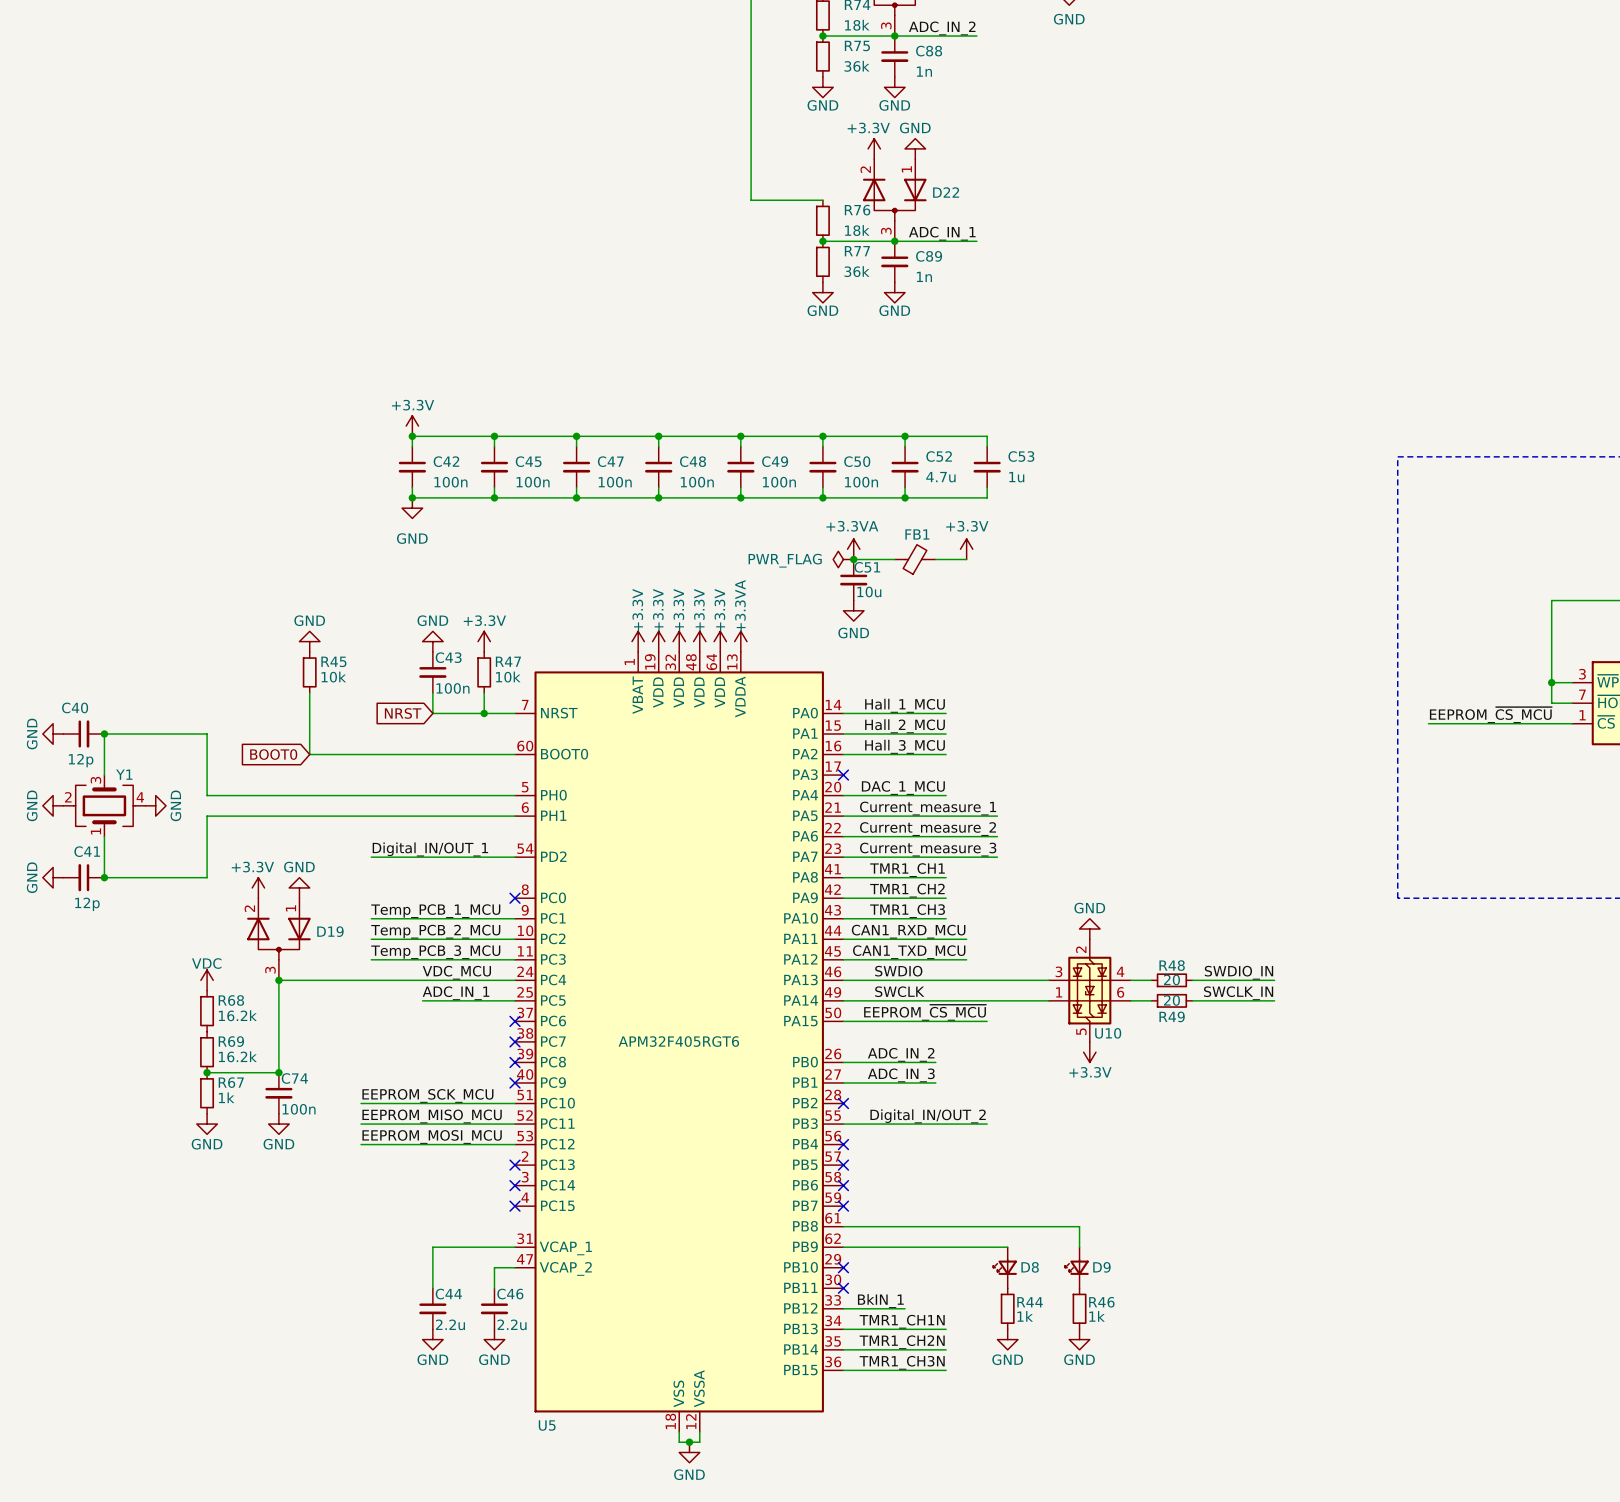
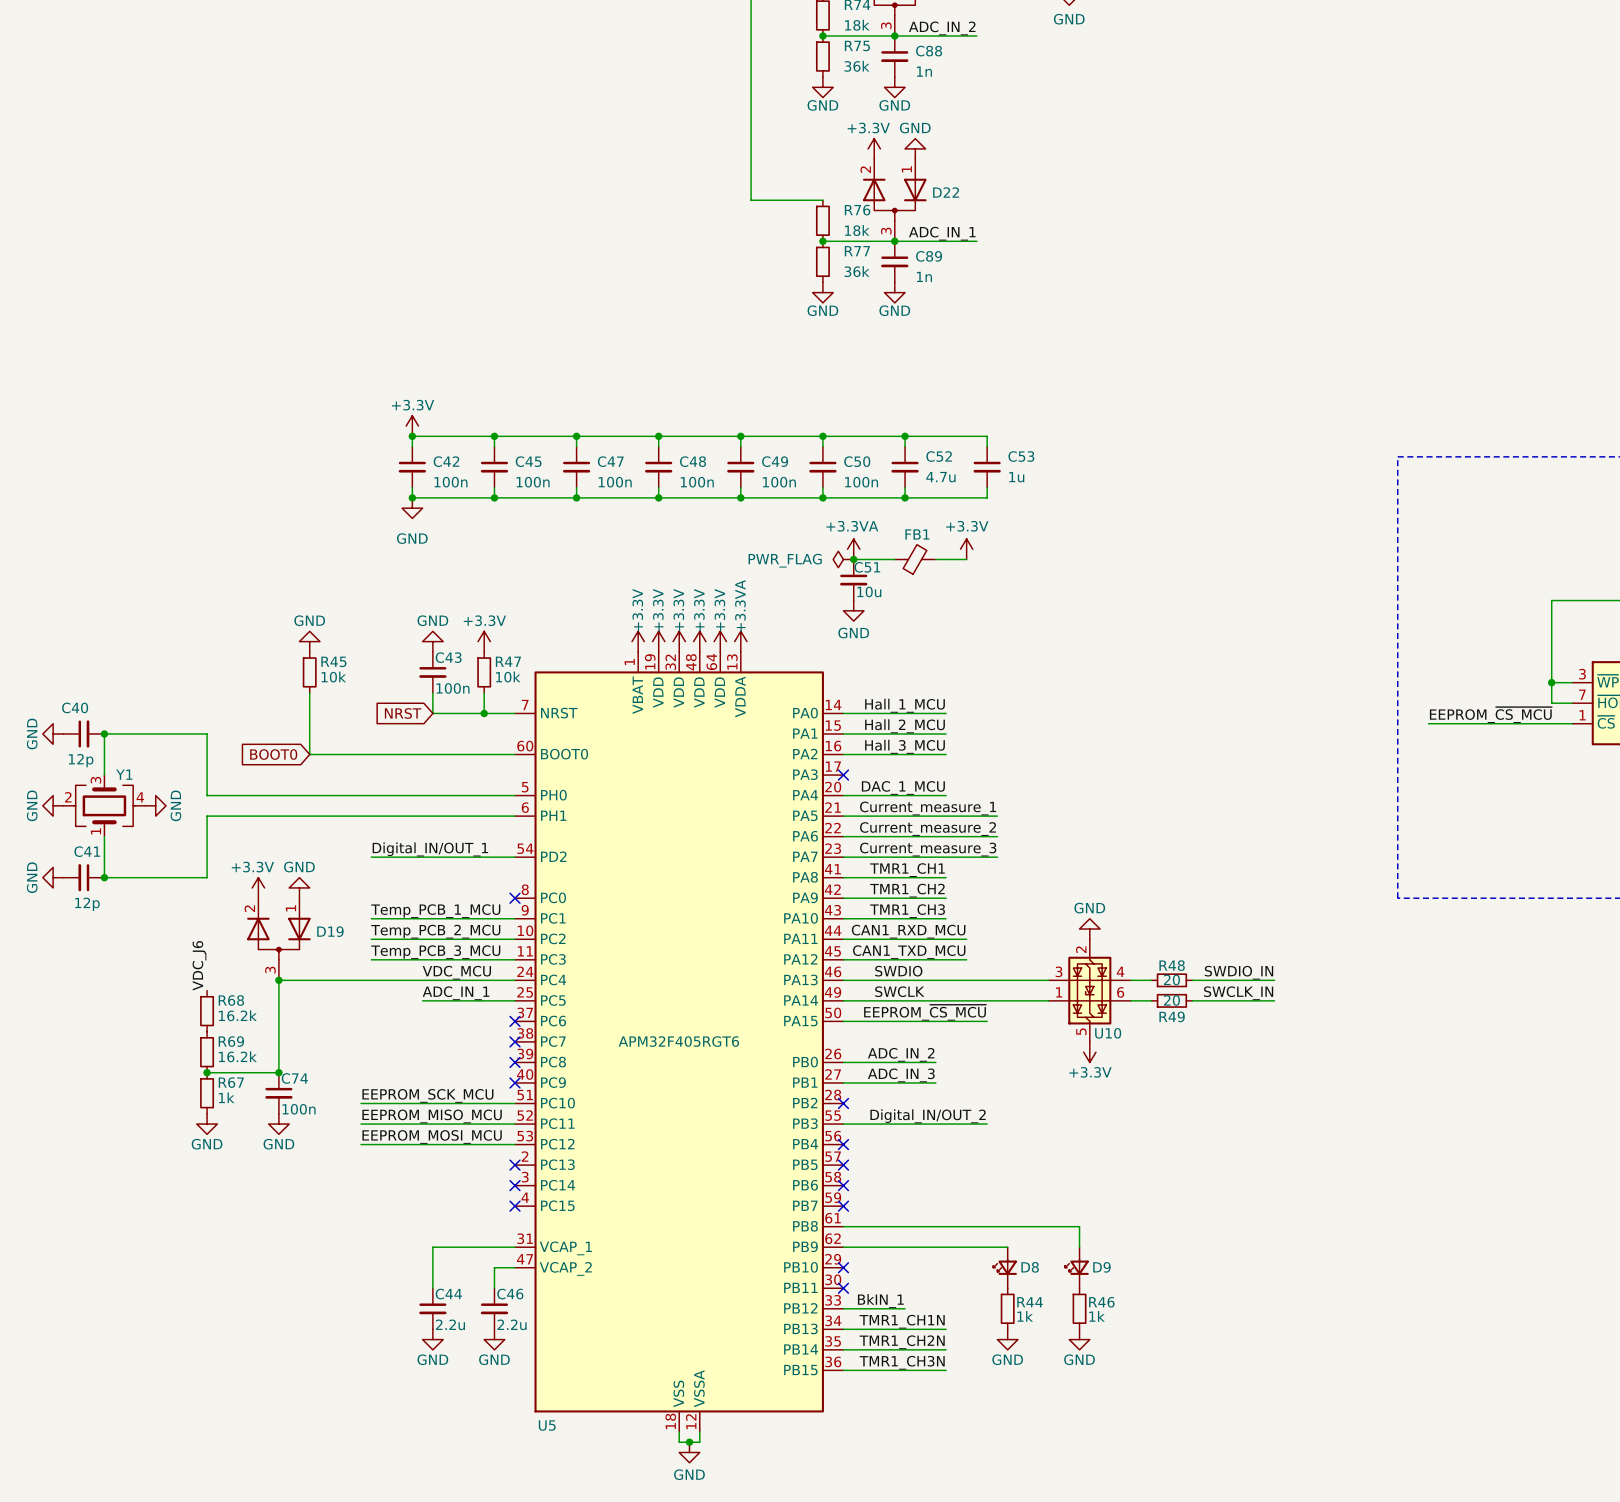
label: none -> VDC_J6 (199, 965)
power symbol: VDC (207, 980) -> none

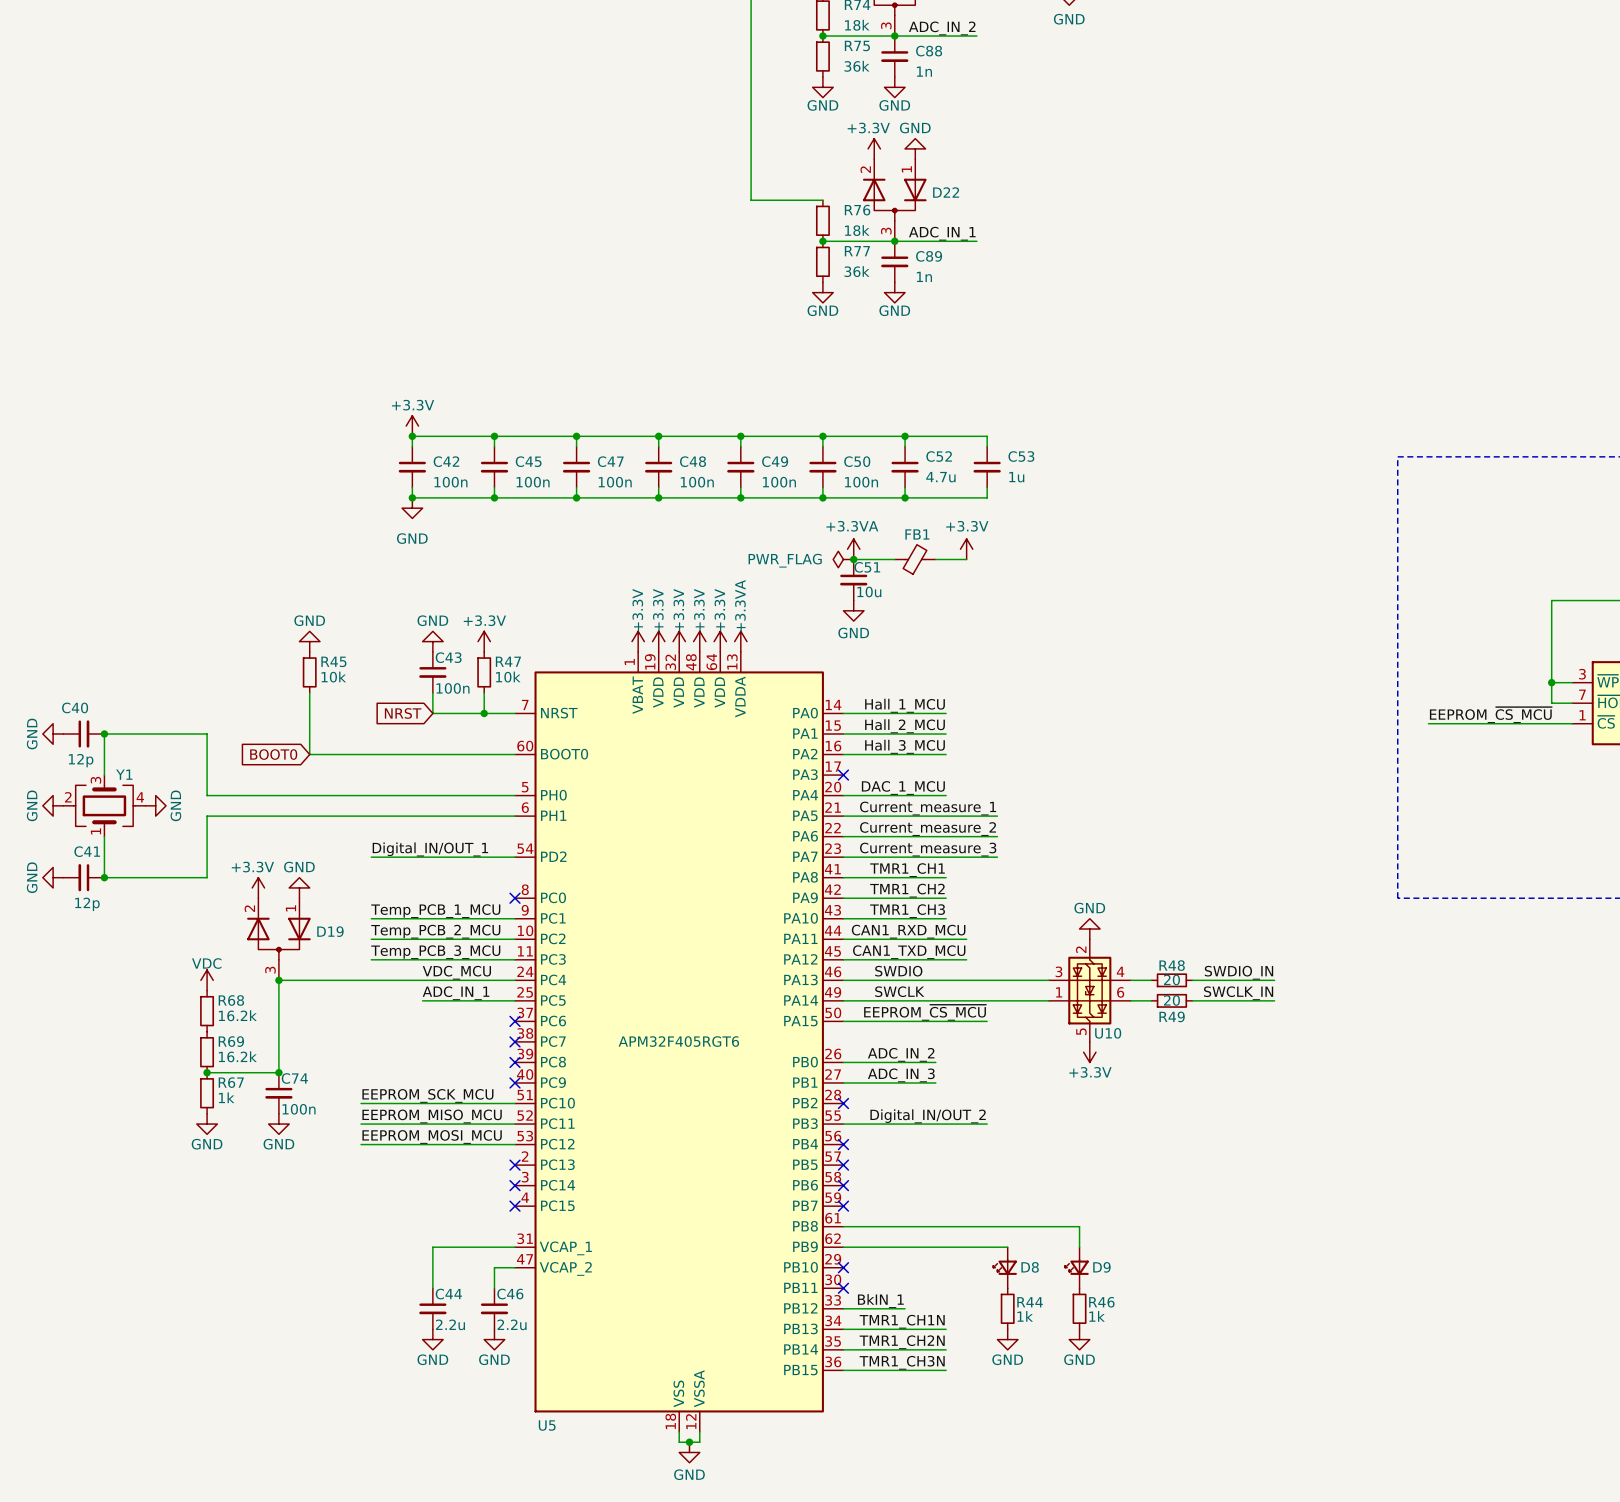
label: VDC_J6 (199, 965) -> none
power symbol: none -> VDC (207, 980)

